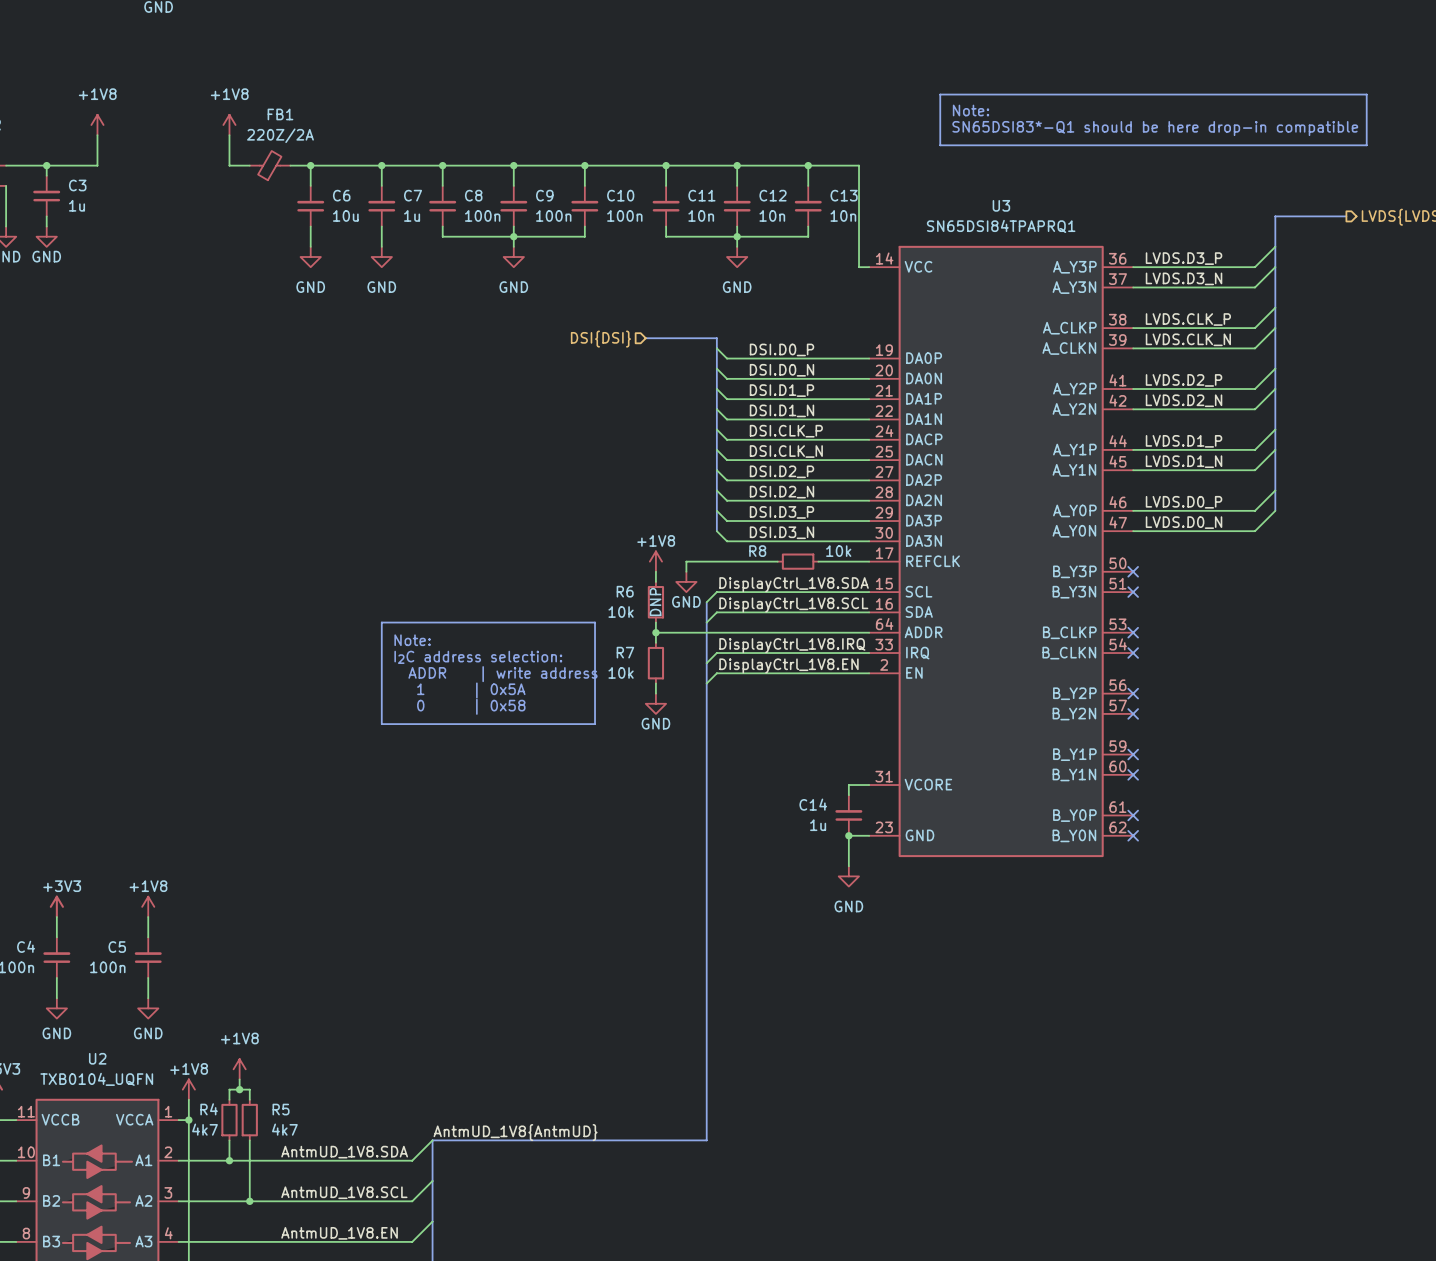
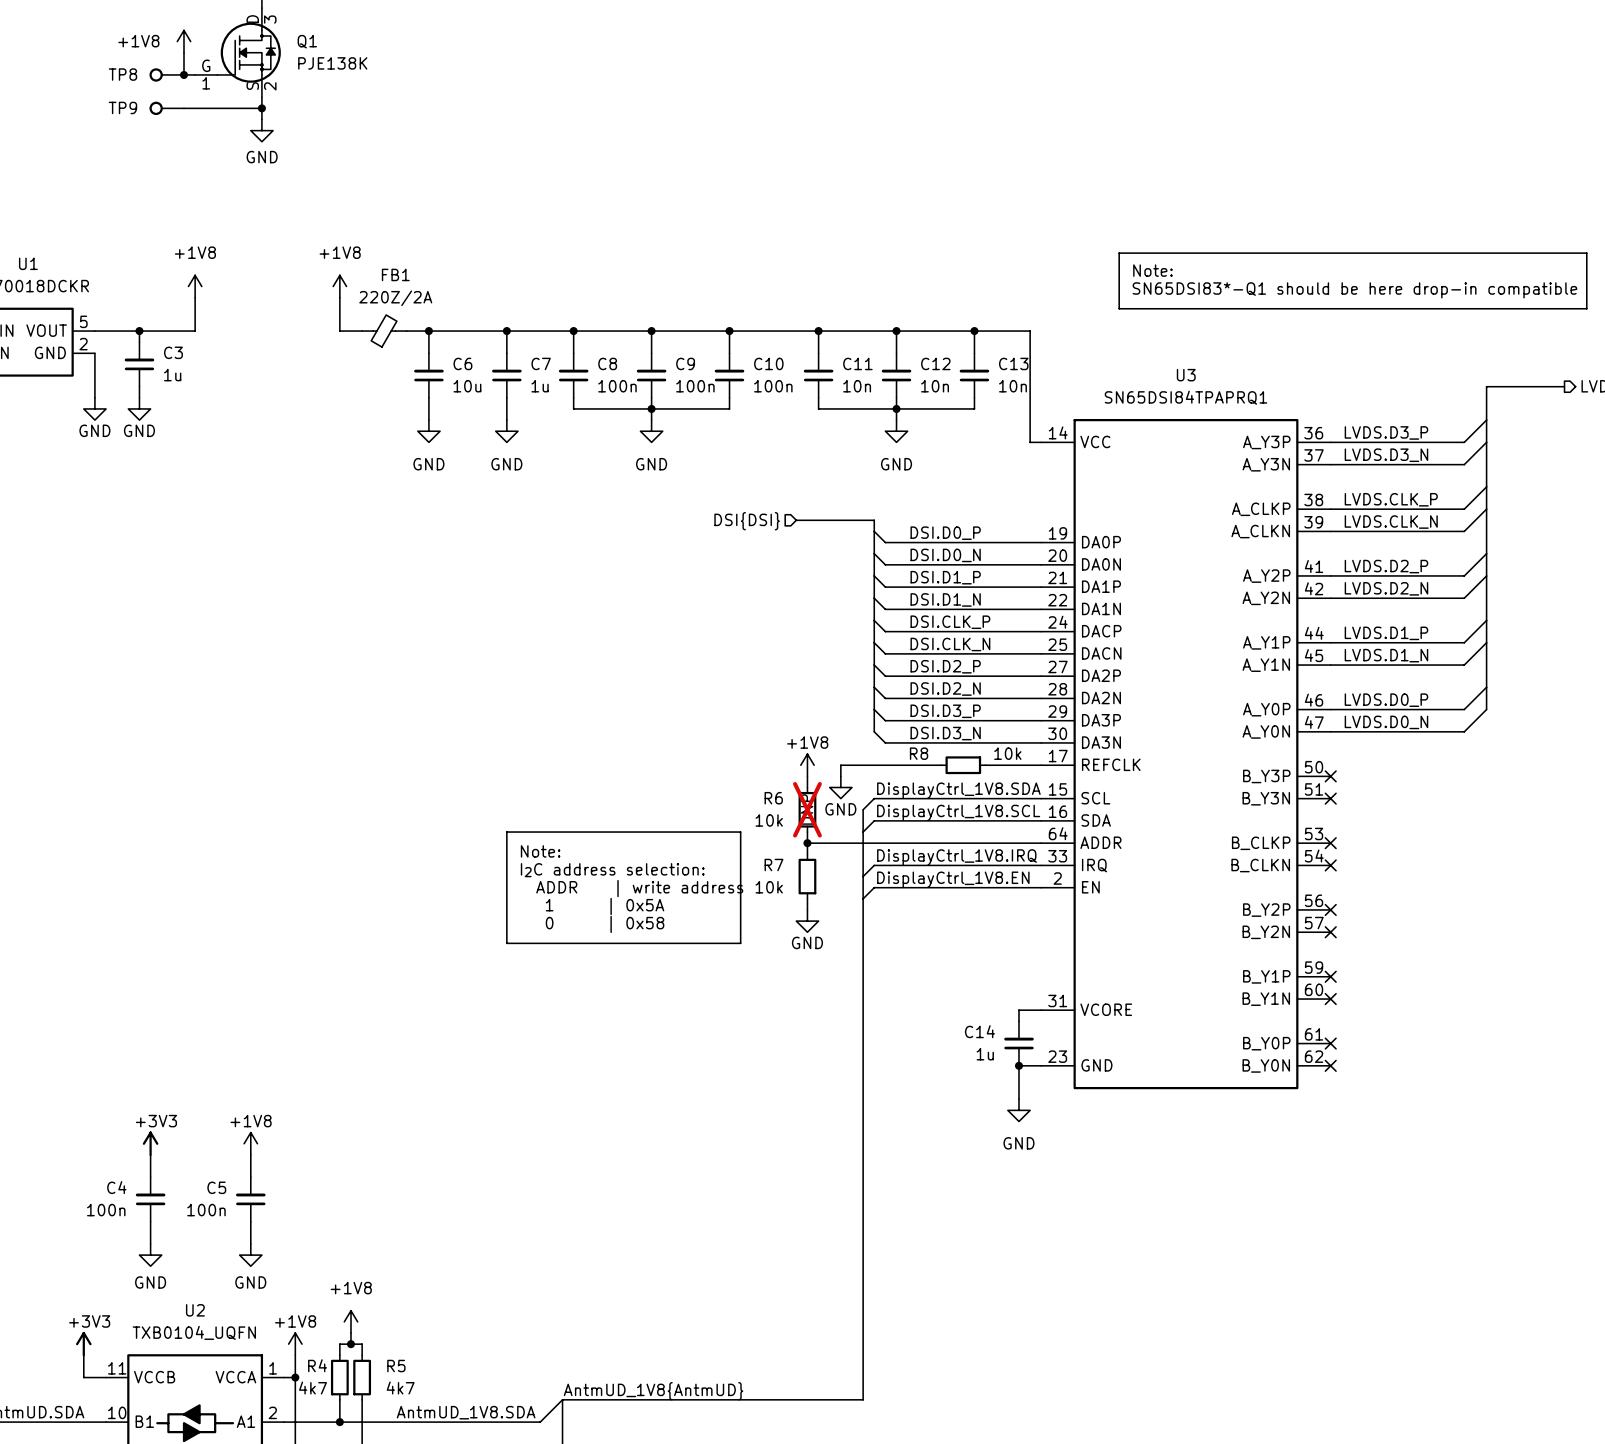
R6 do-not-place cross: none -> (807, 809)

